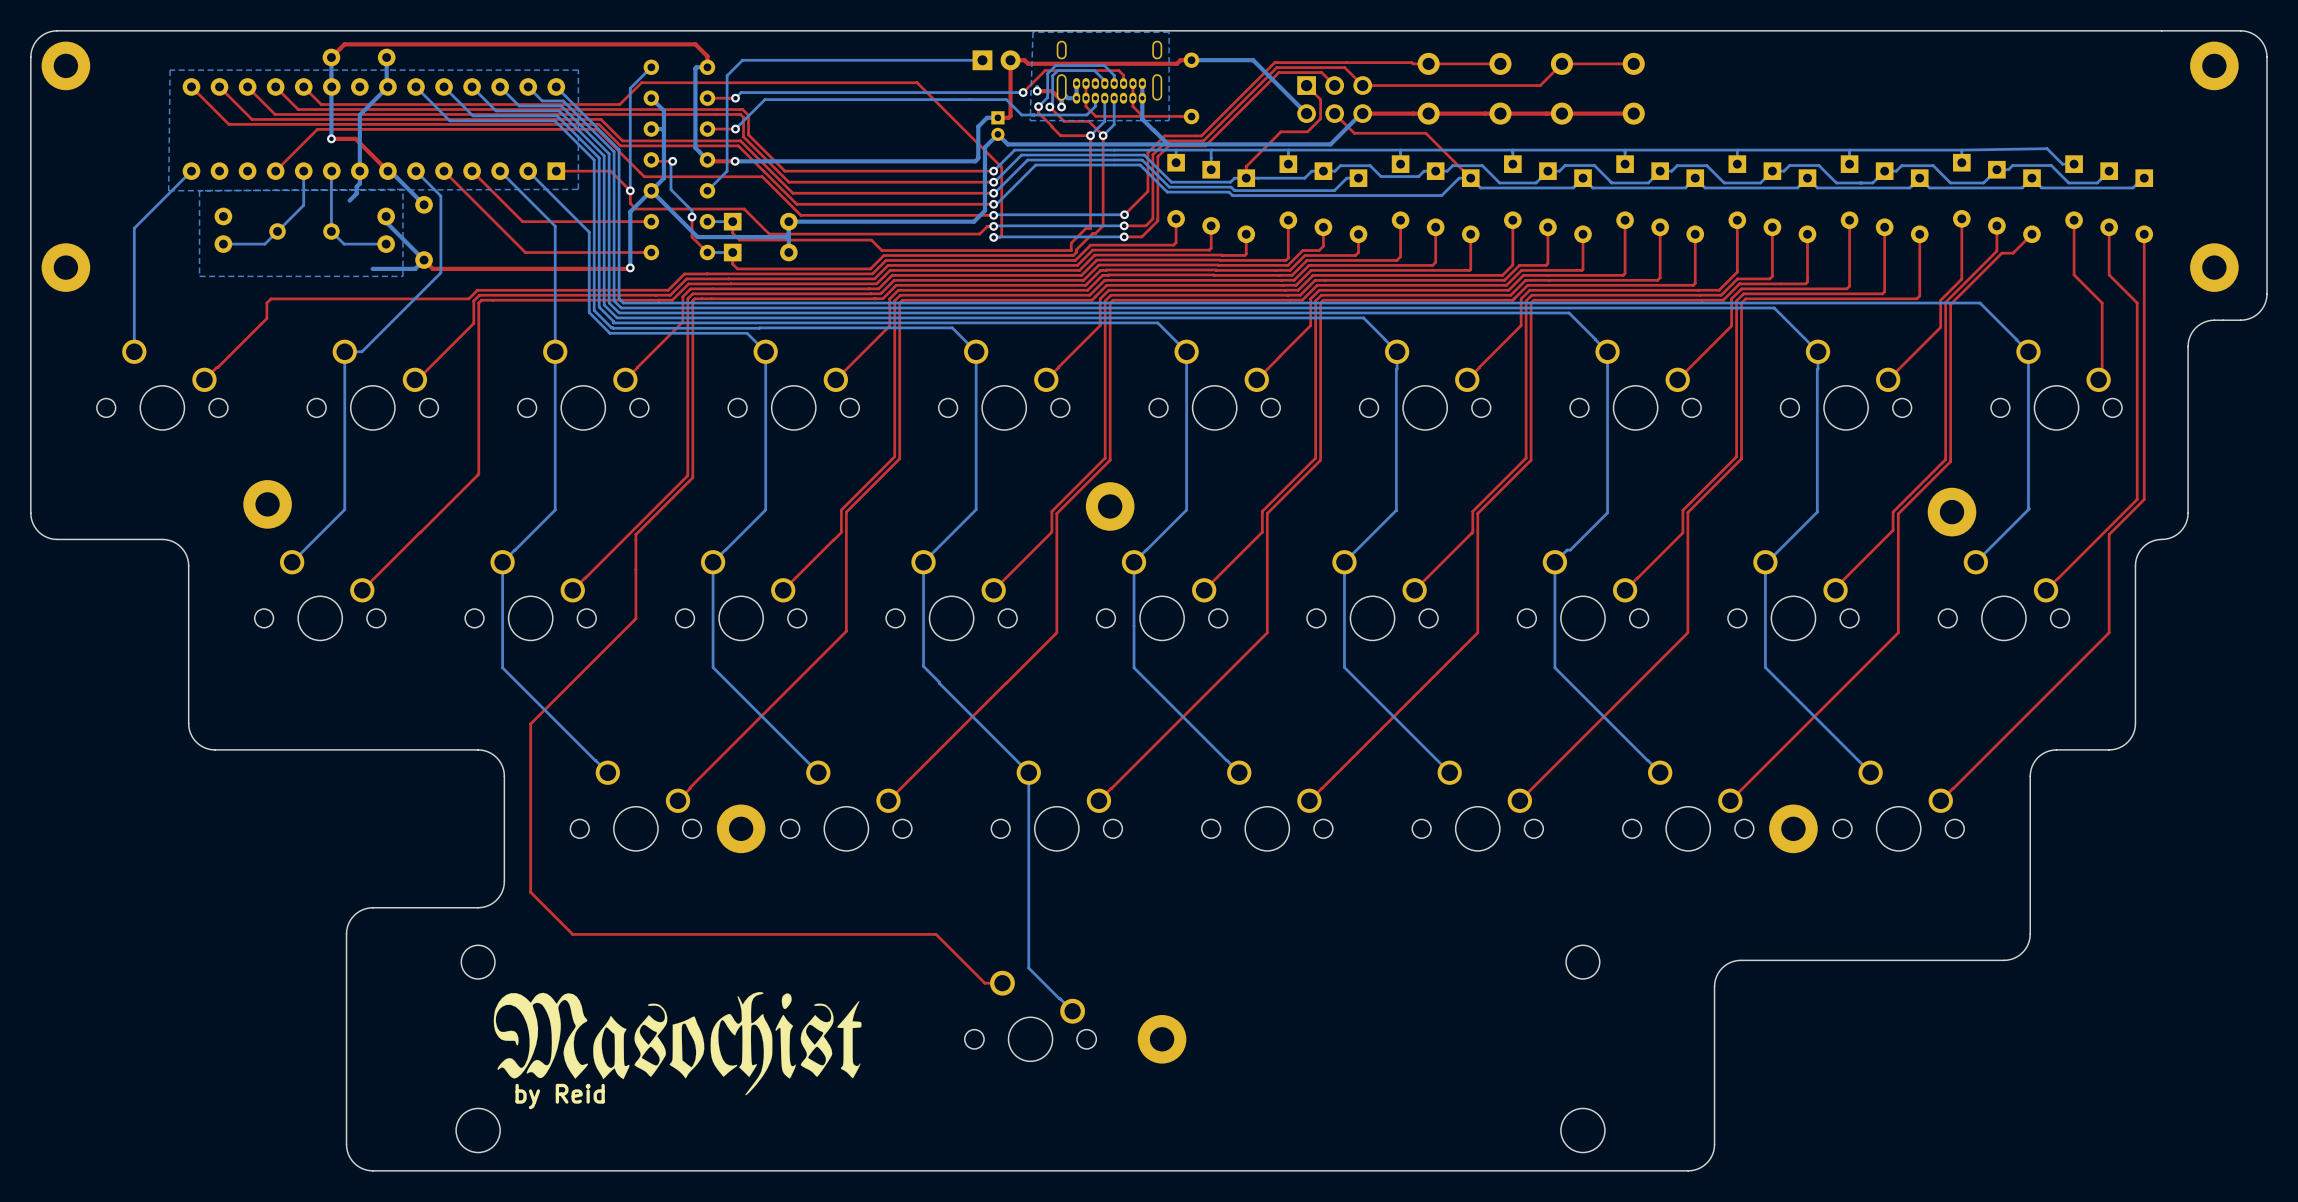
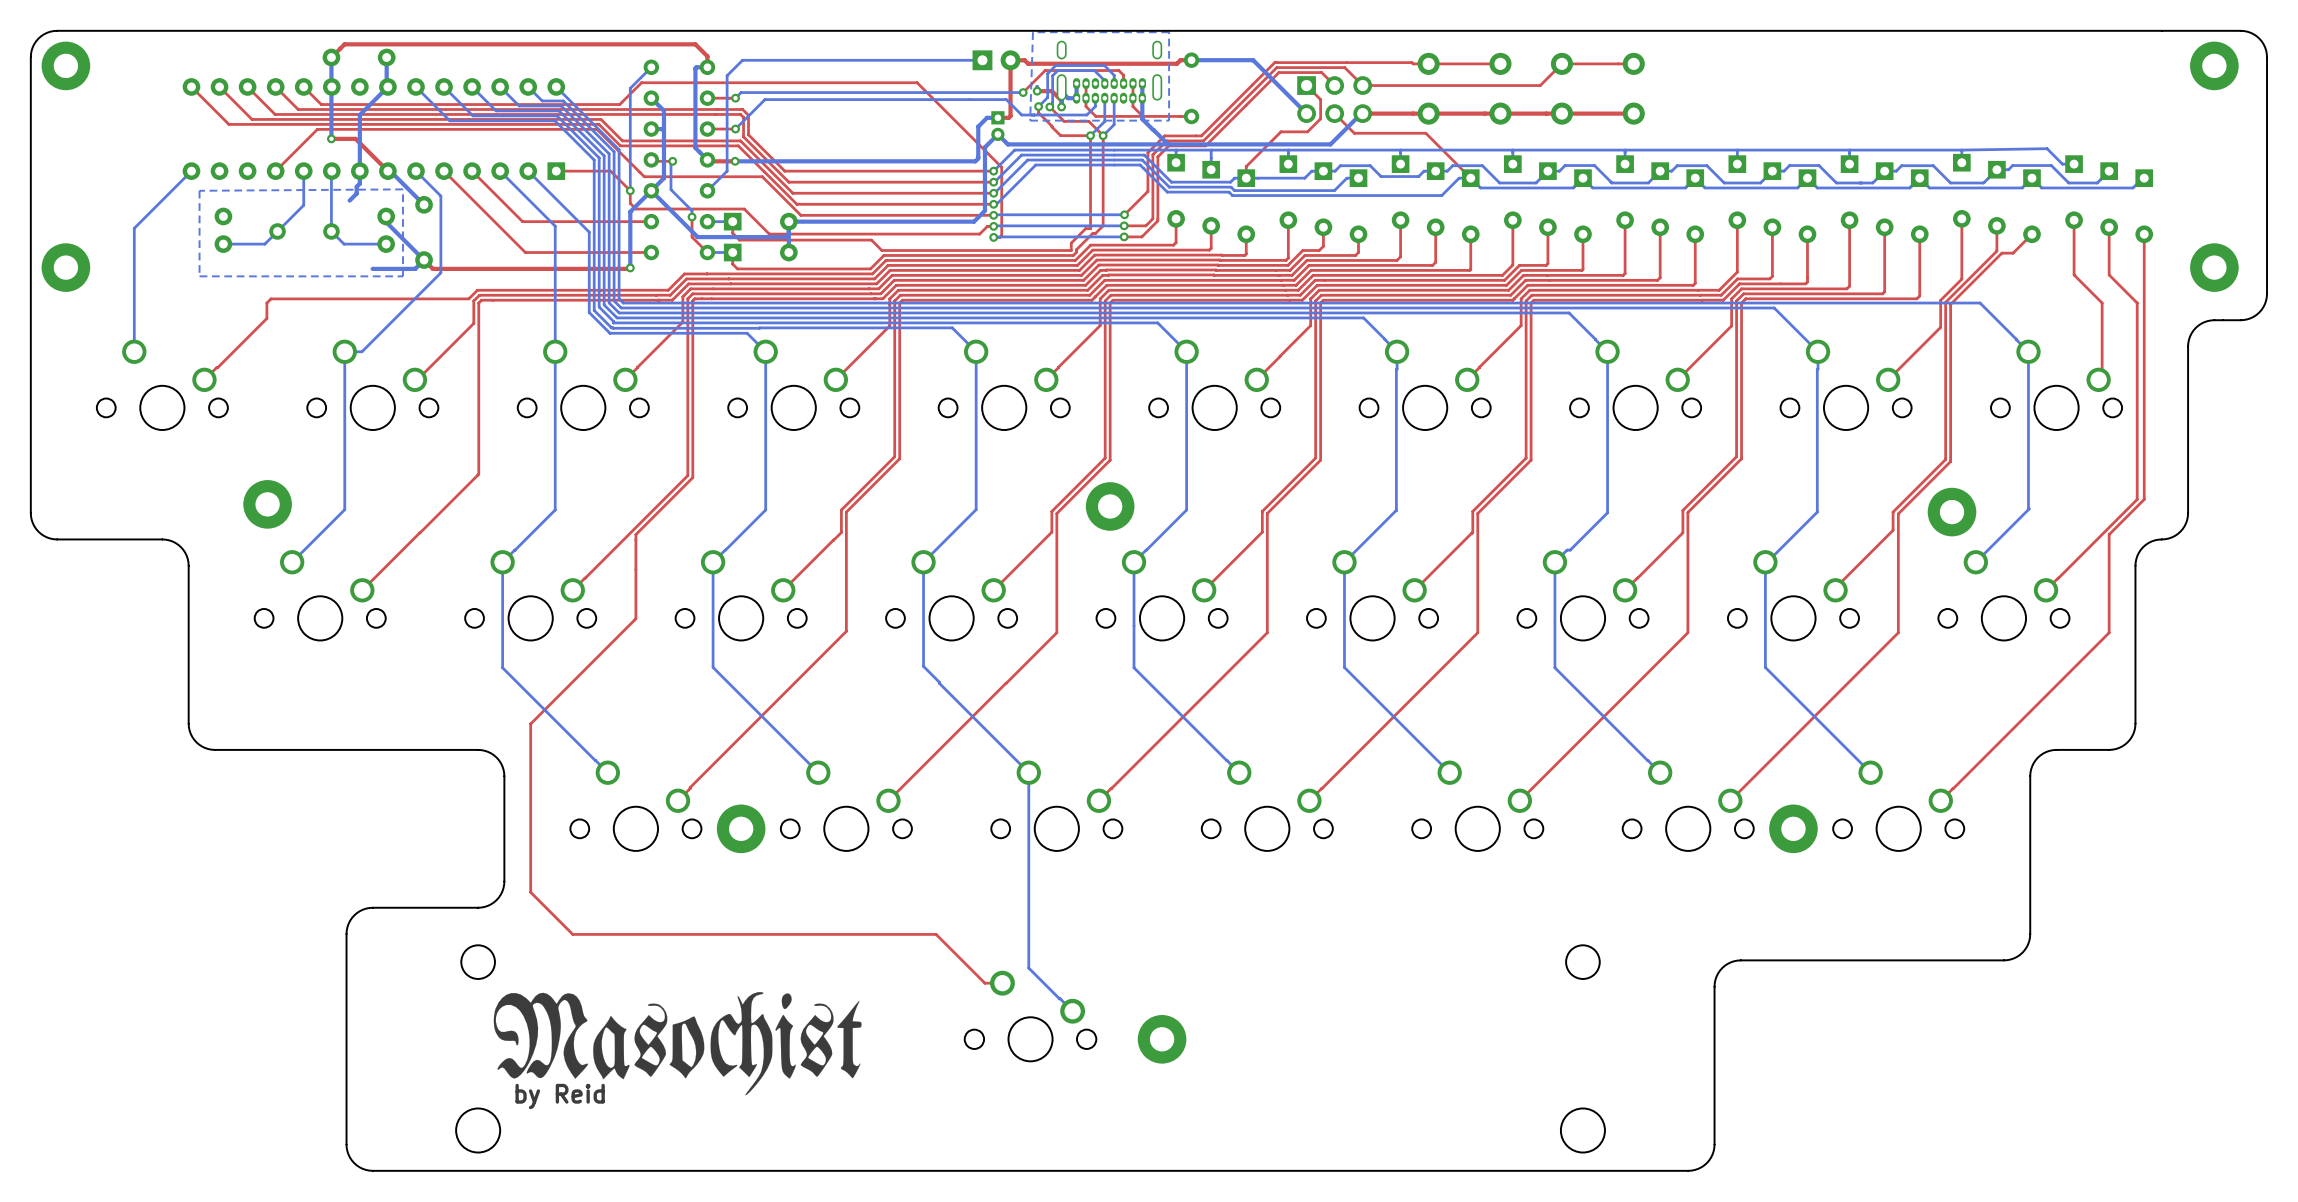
bottom zone outline: (578, 70) (578, 189) (168, 190) (170, 70) (578, 70) -> none

